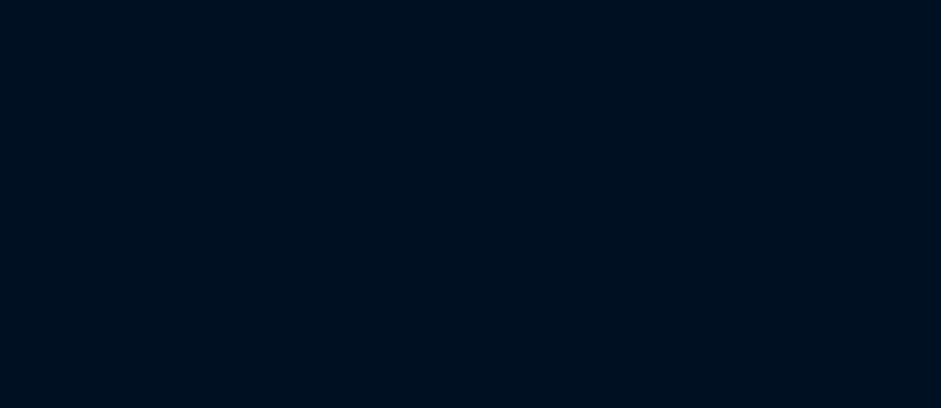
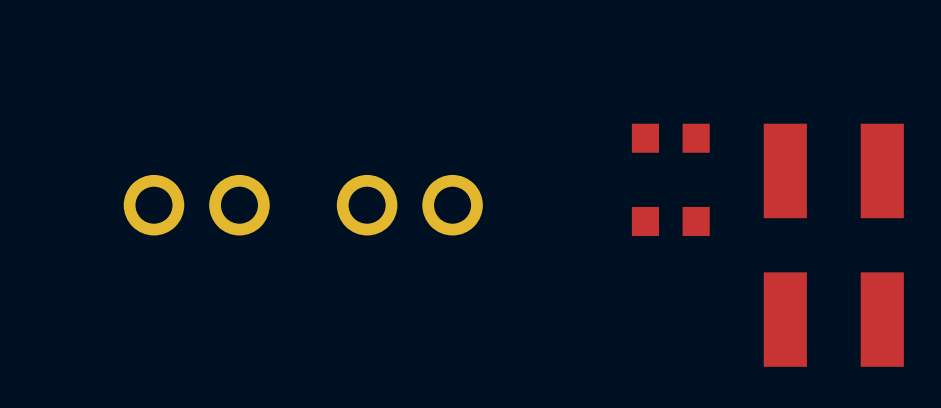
part: none -> (670, 138)
part: none -> (833, 170)
part: none -> (196, 205)
part: none -> (409, 205)
part: none -> (670, 221)
part: none -> (833, 319)

